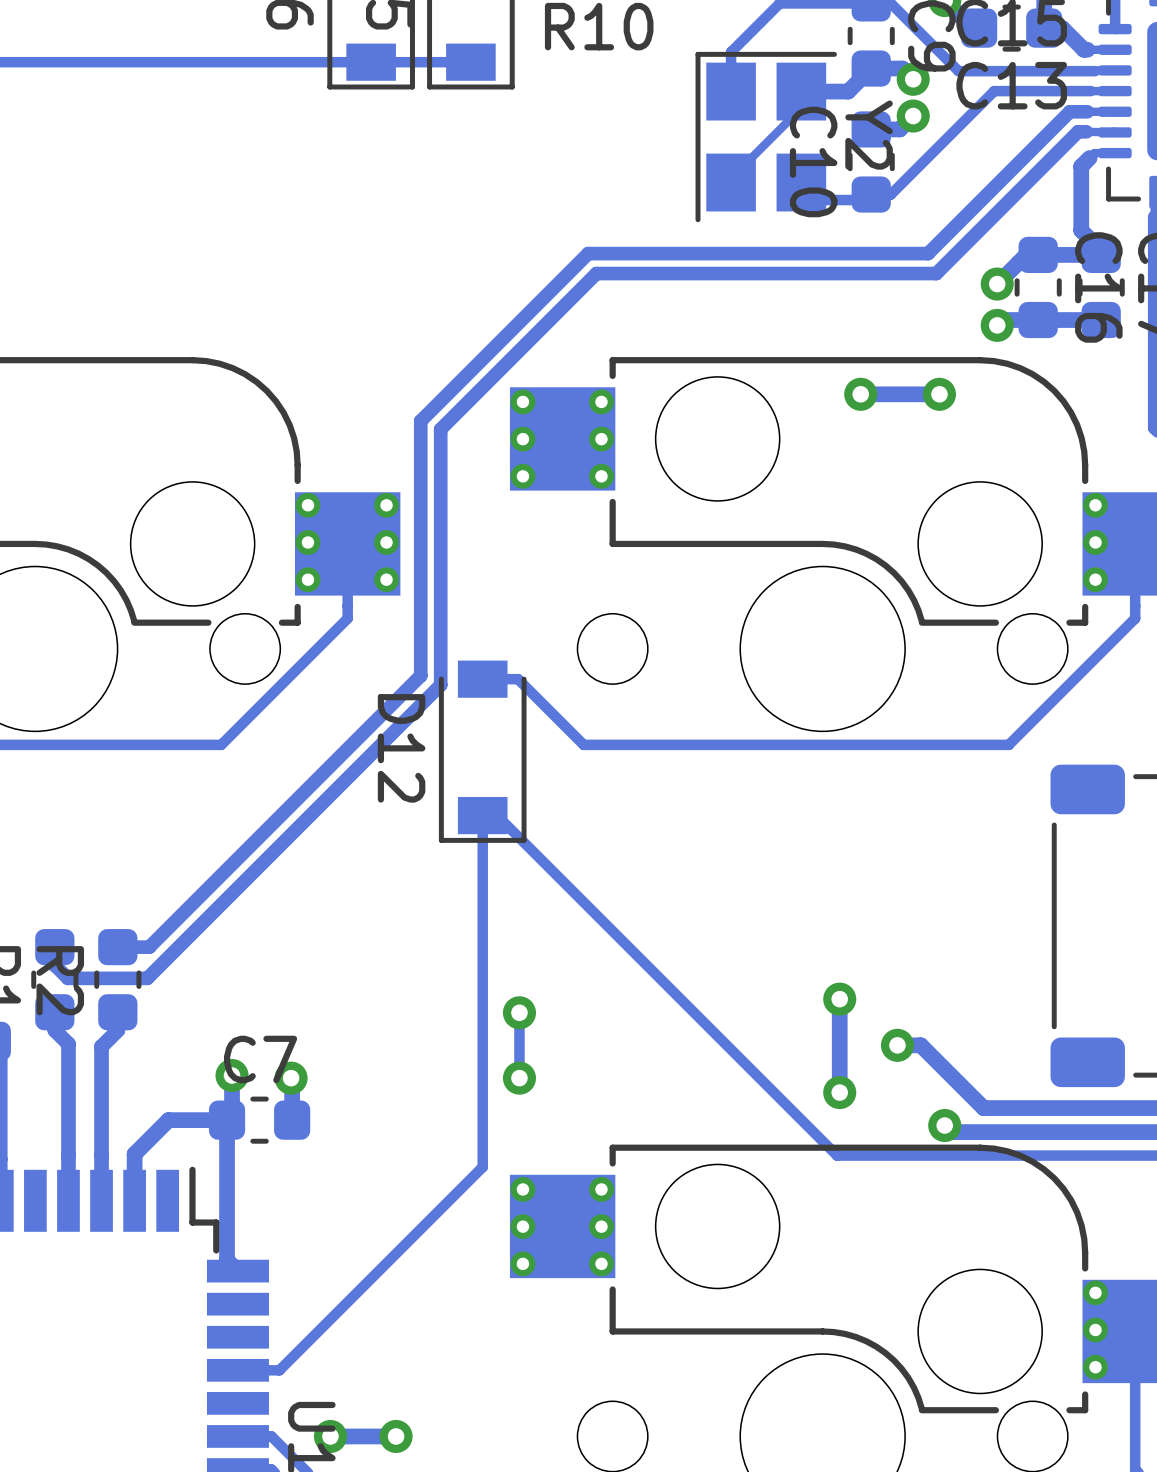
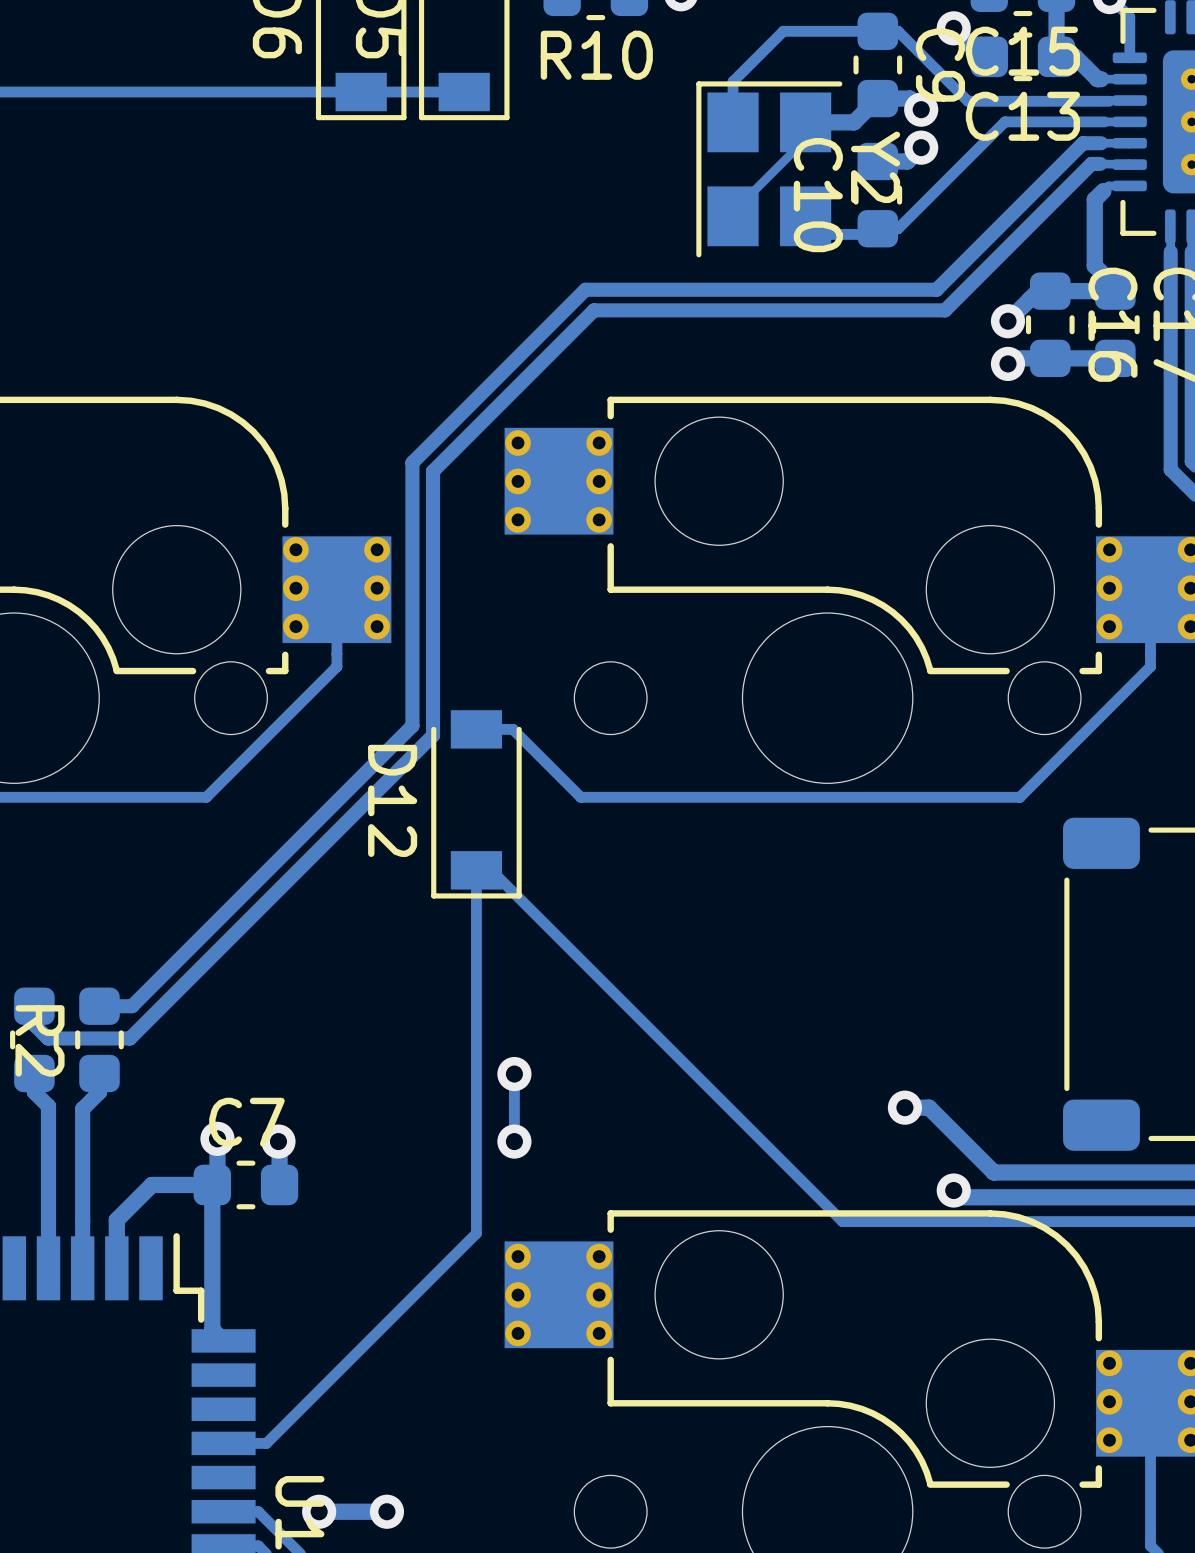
via: (860, 394) -> none
track: (939, 394) (860, 394) -> none
via: (939, 394) -> none
track: (839, 999) (839, 1092) -> none
via: (839, 999) -> none
via: (839, 1092) -> none

